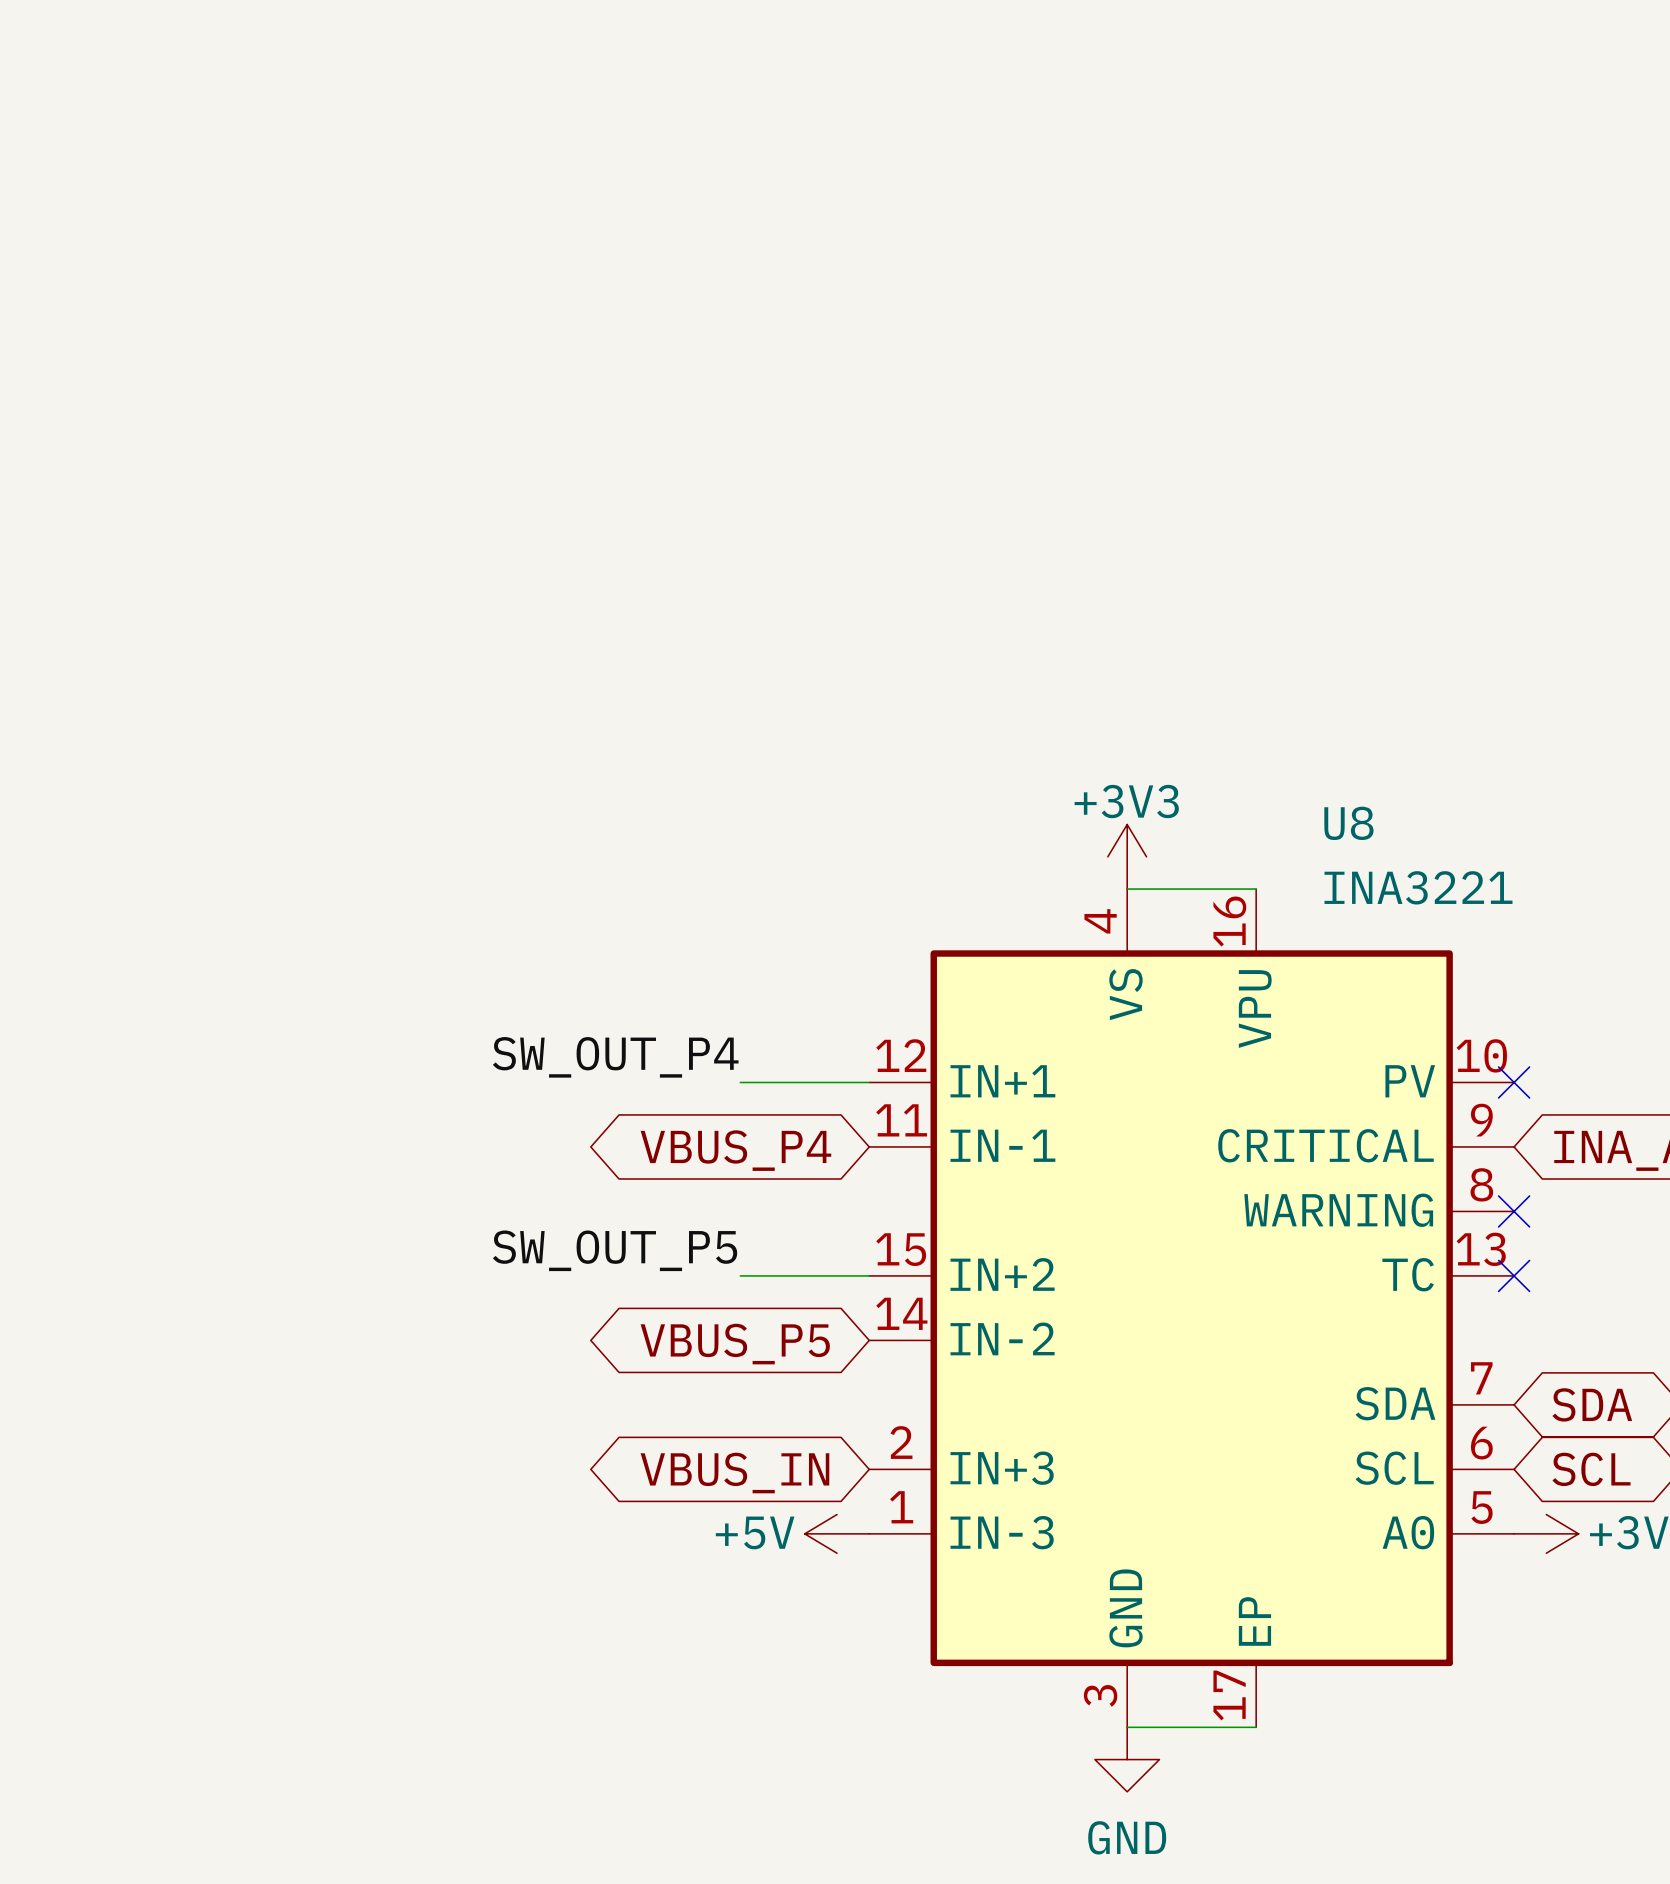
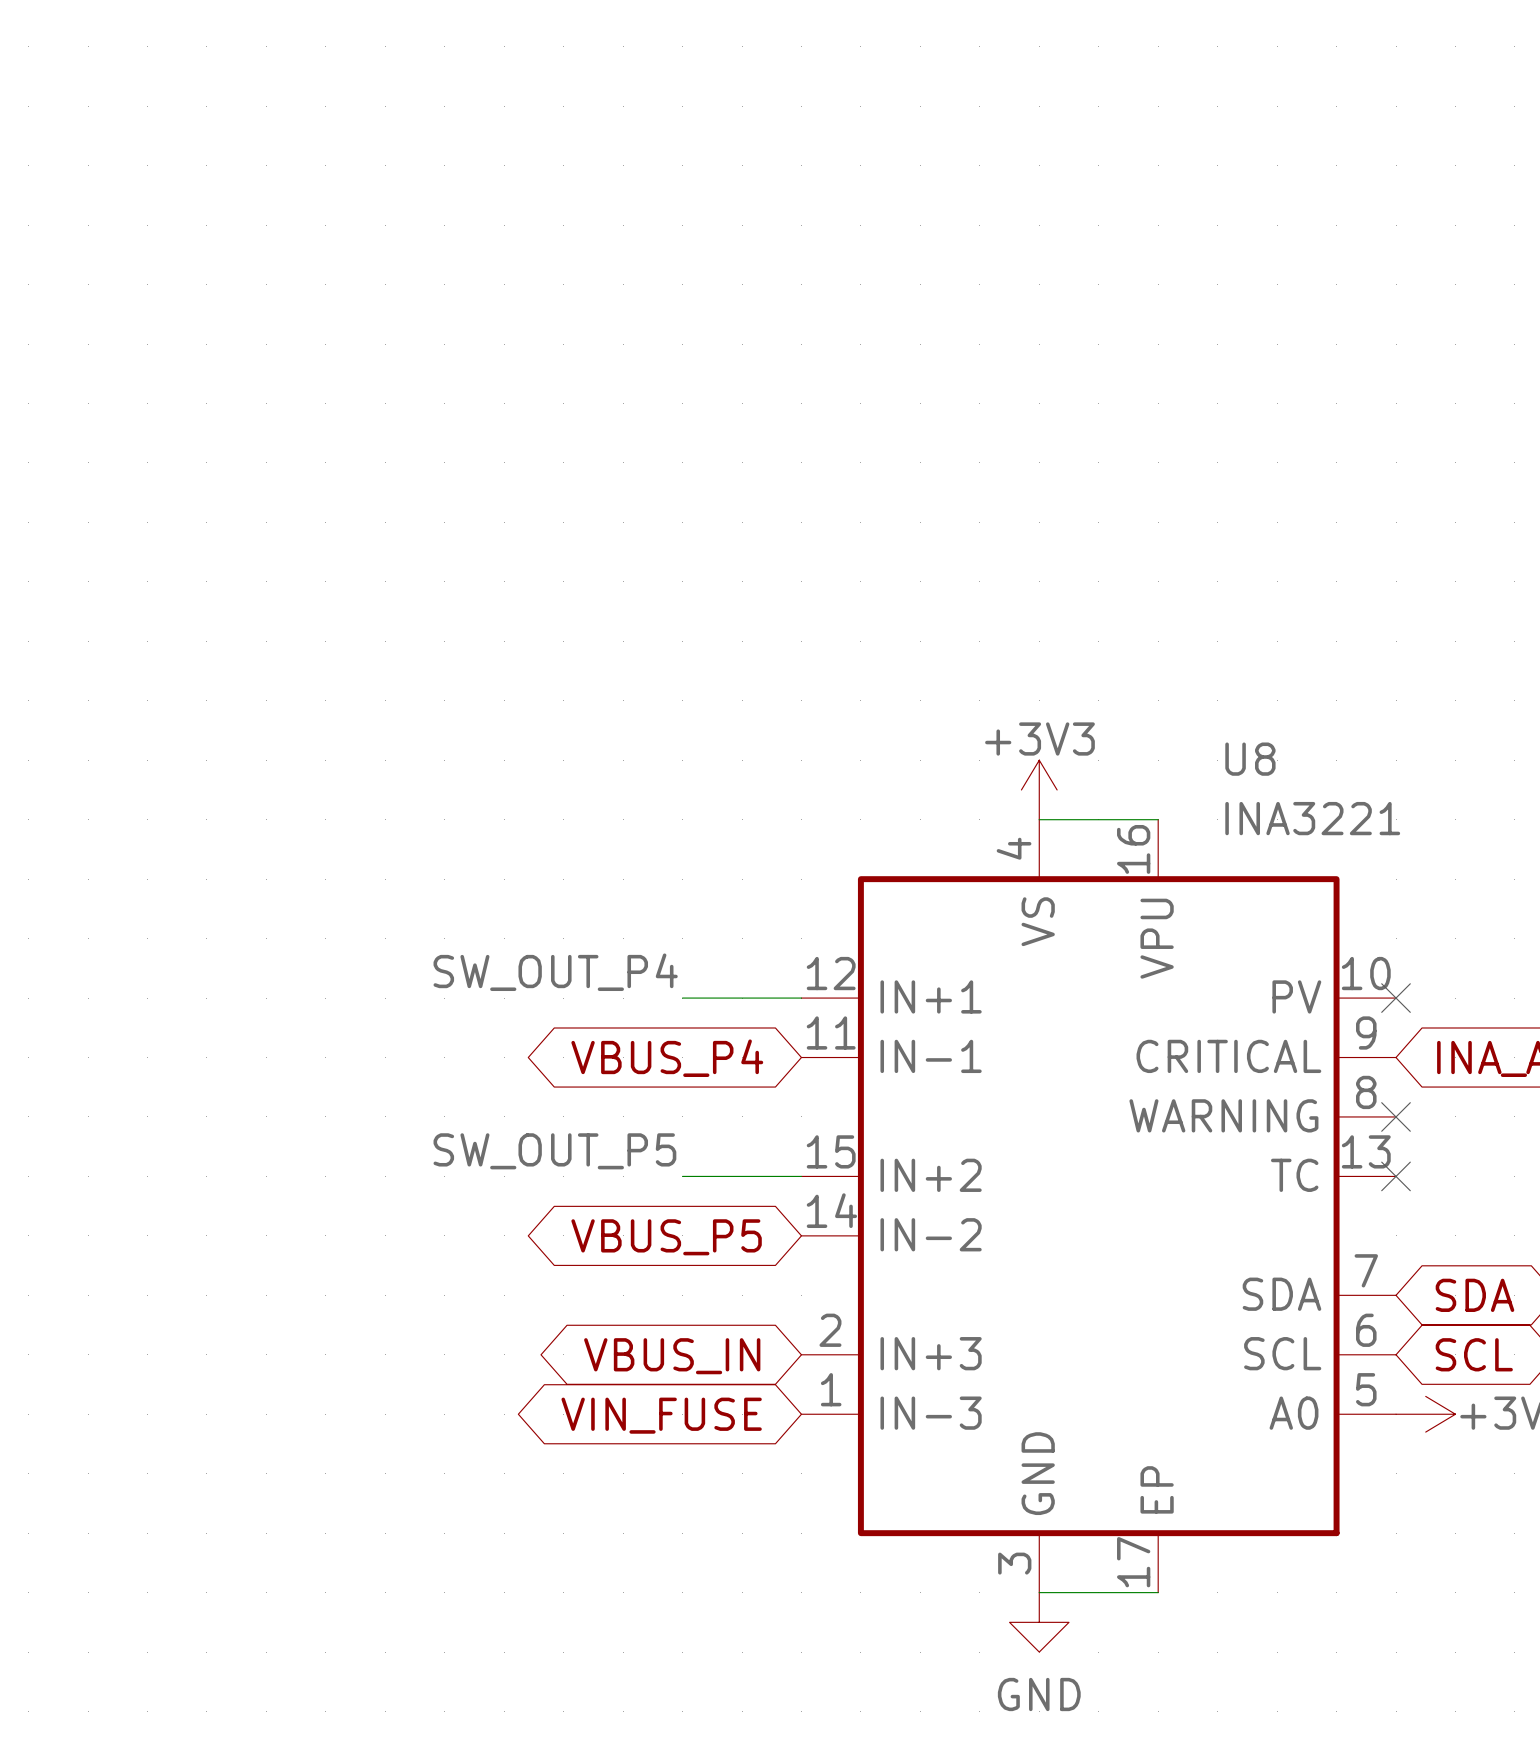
power symbol: +5V (837, 1533) -> none
global label: none -> VIN_FUSE (661, 1415)

